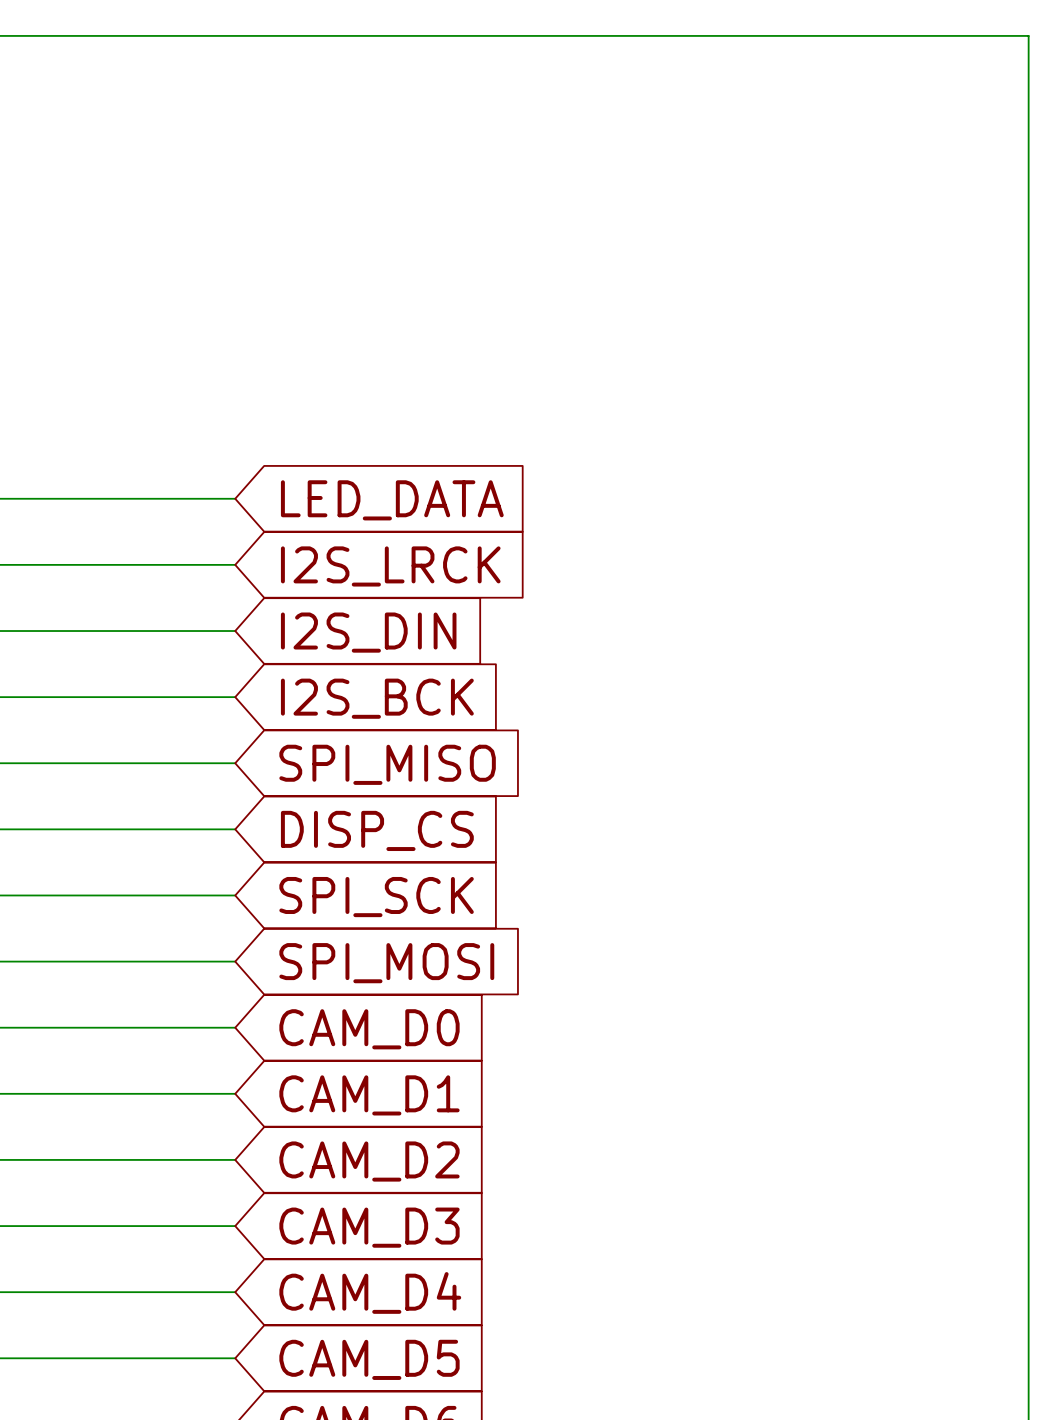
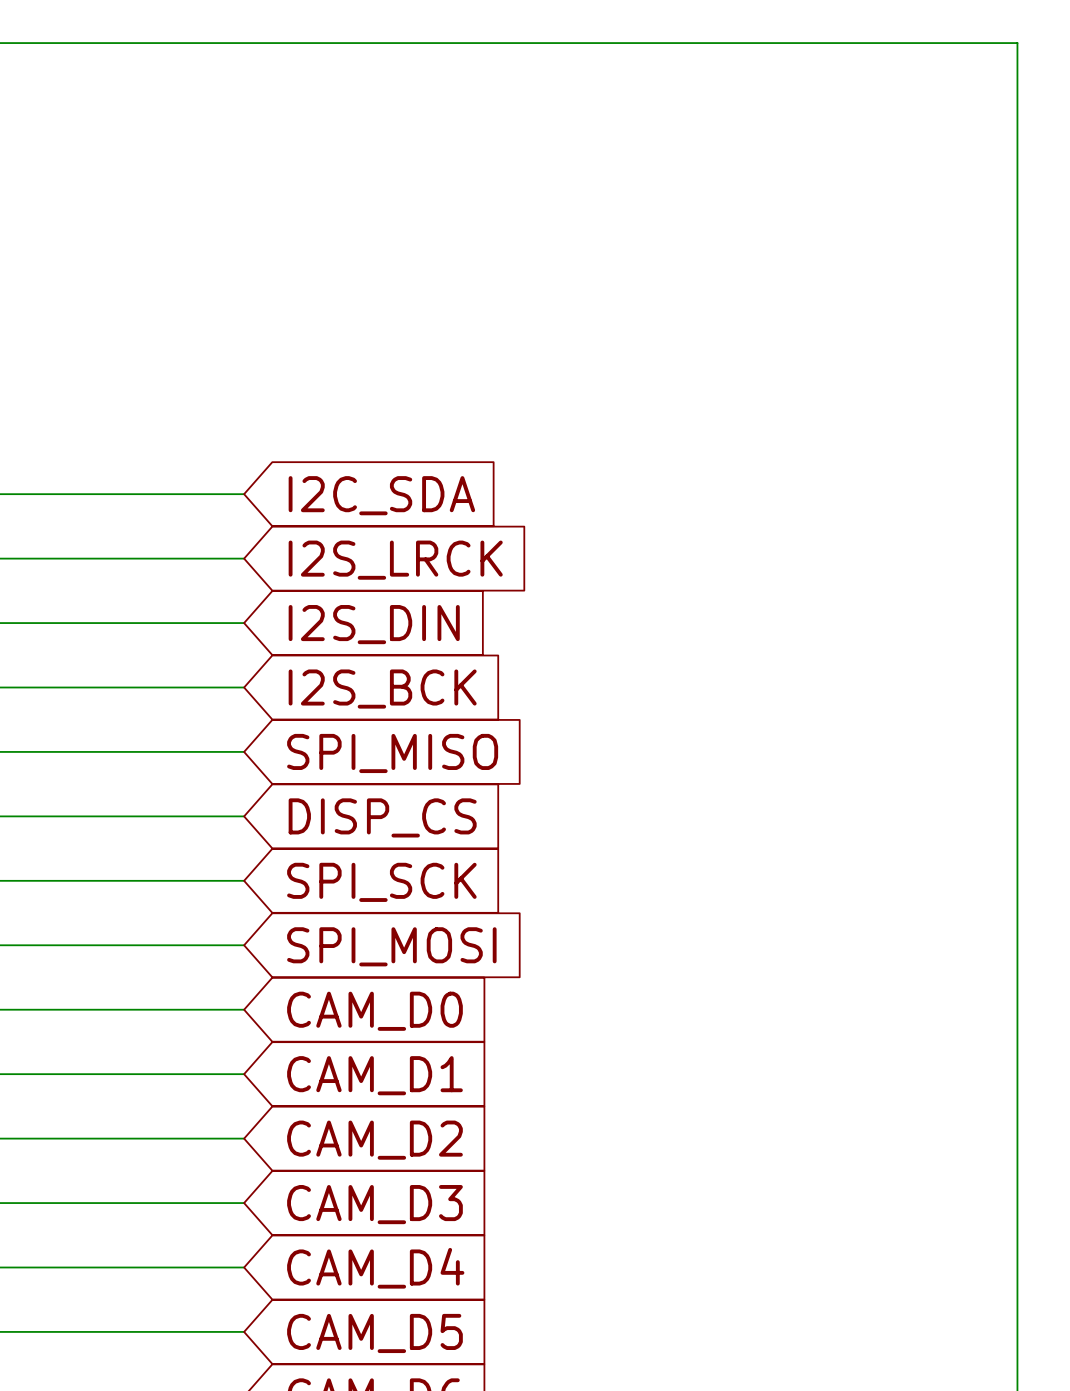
global label: LED_DATA (392, 500) -> I2C_SDA (381, 495)

